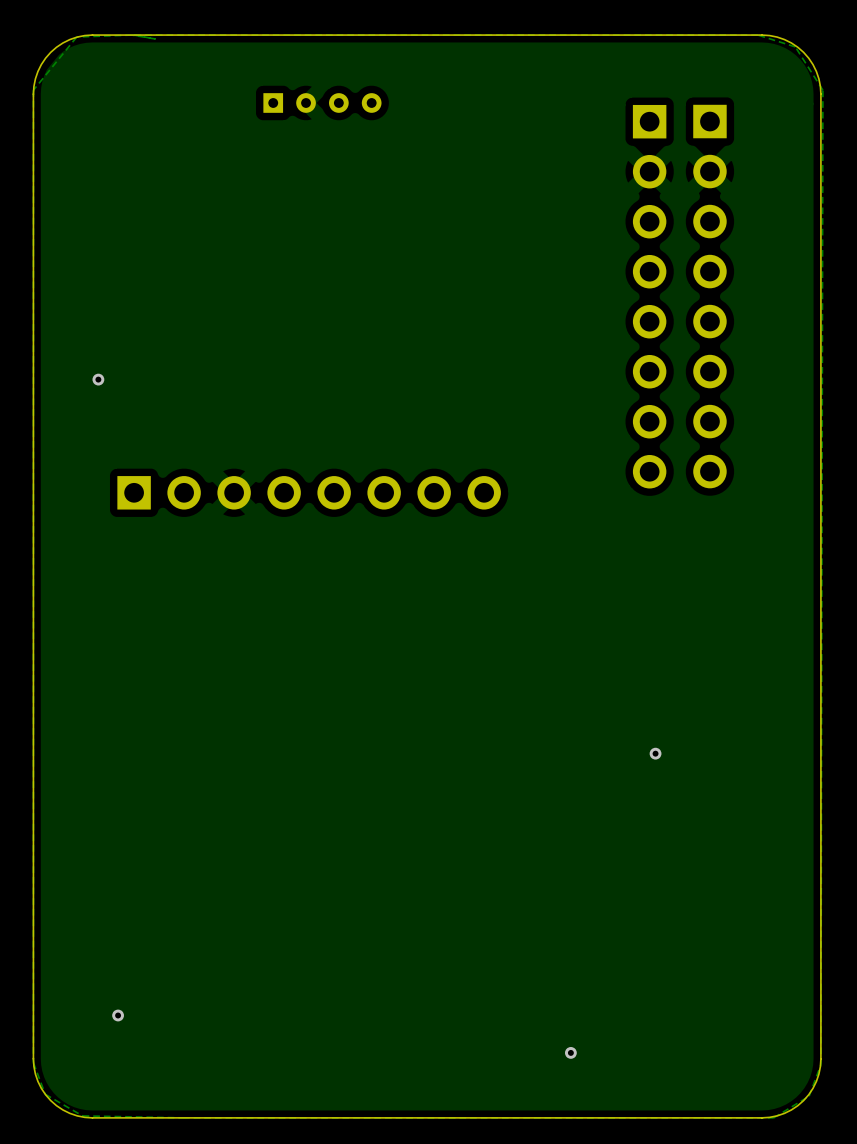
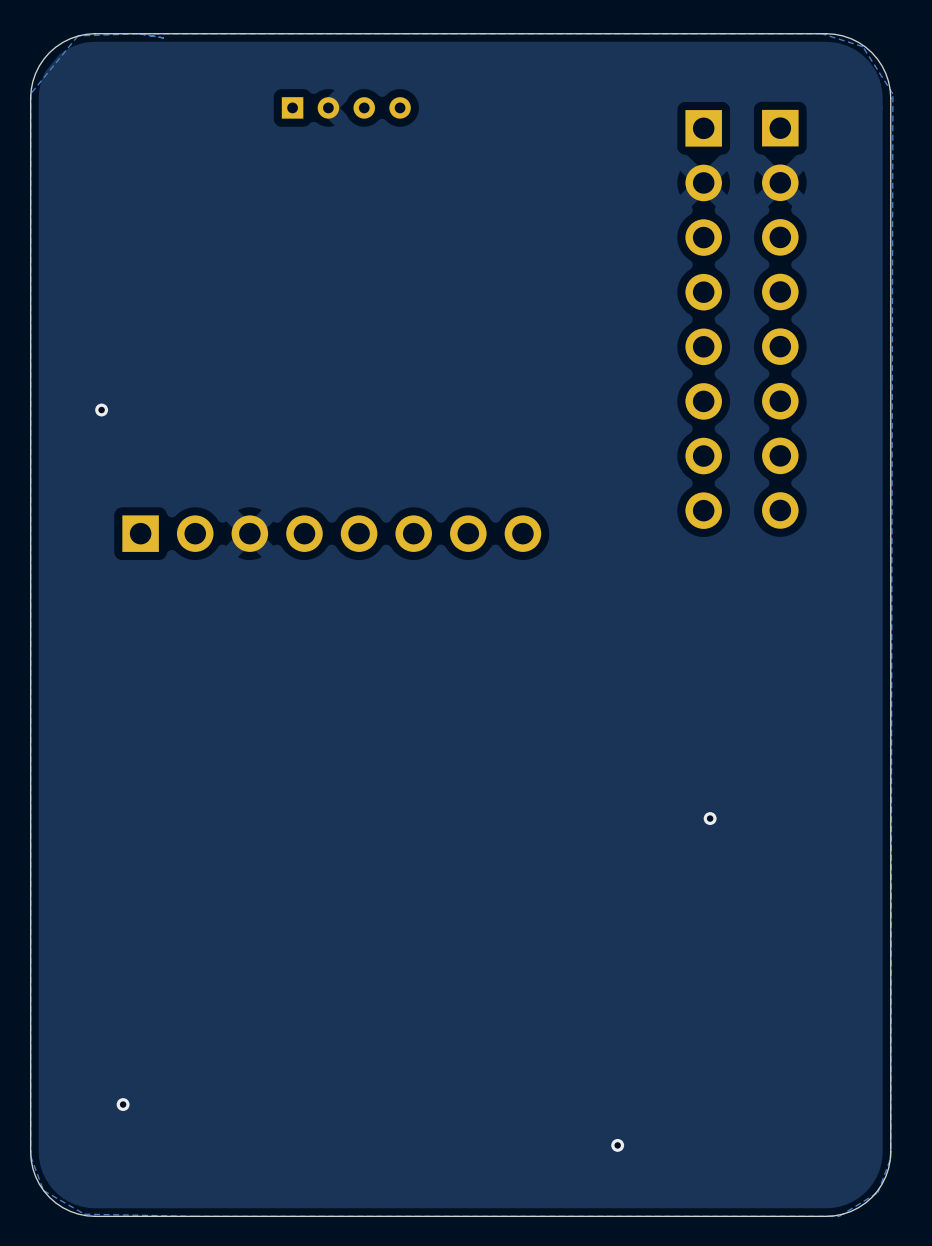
part footprint: [632, 104, 727, 489] -> [685, 109, 799, 529]

